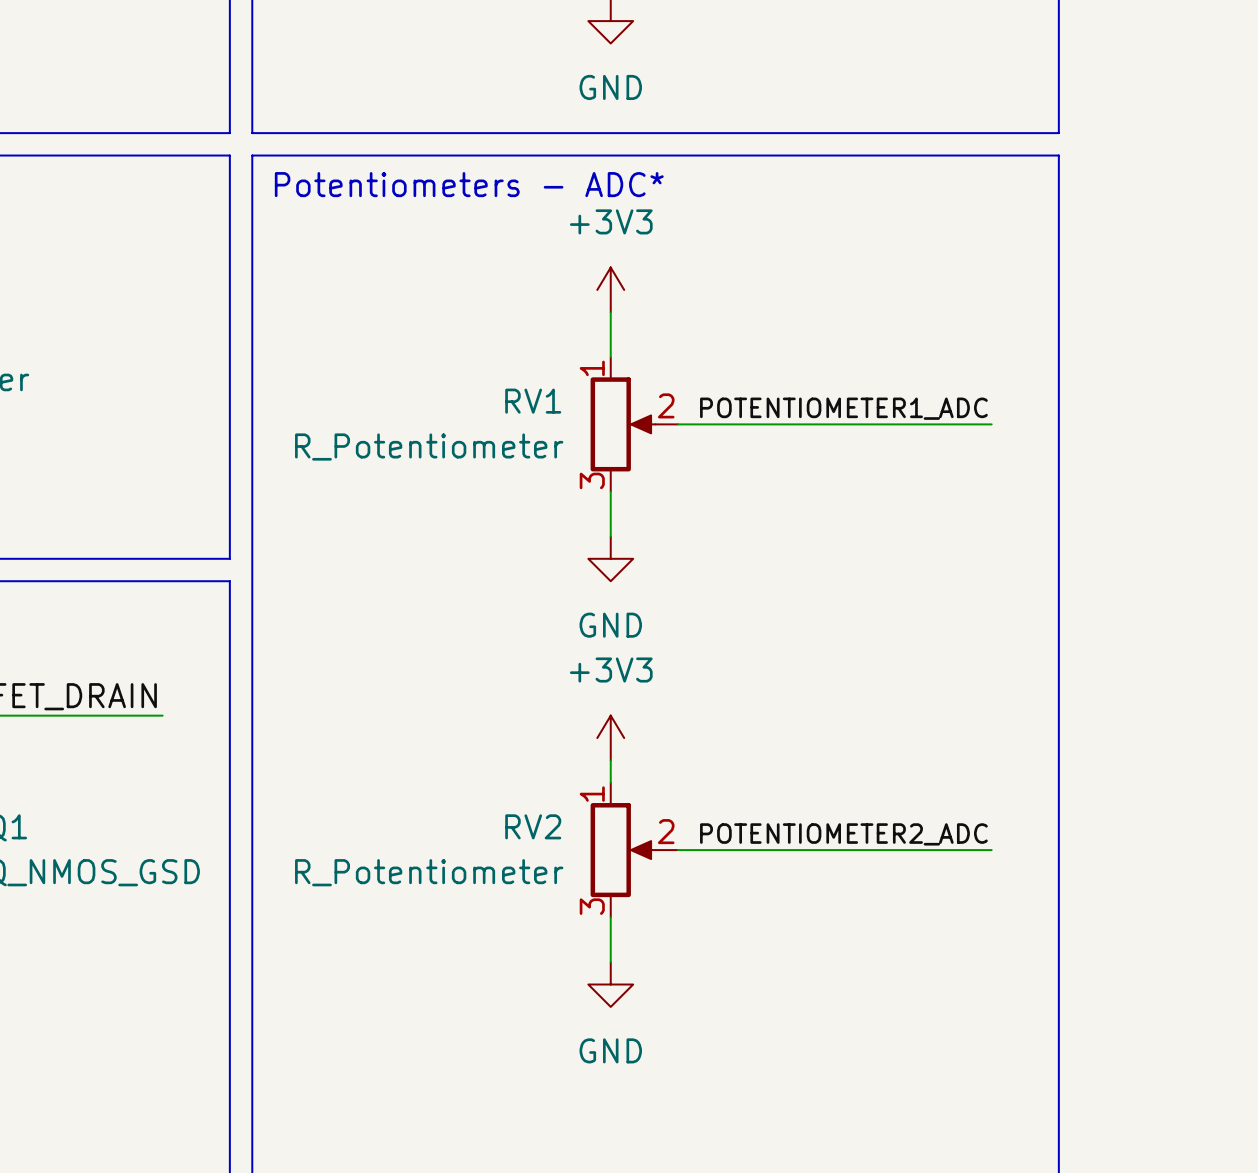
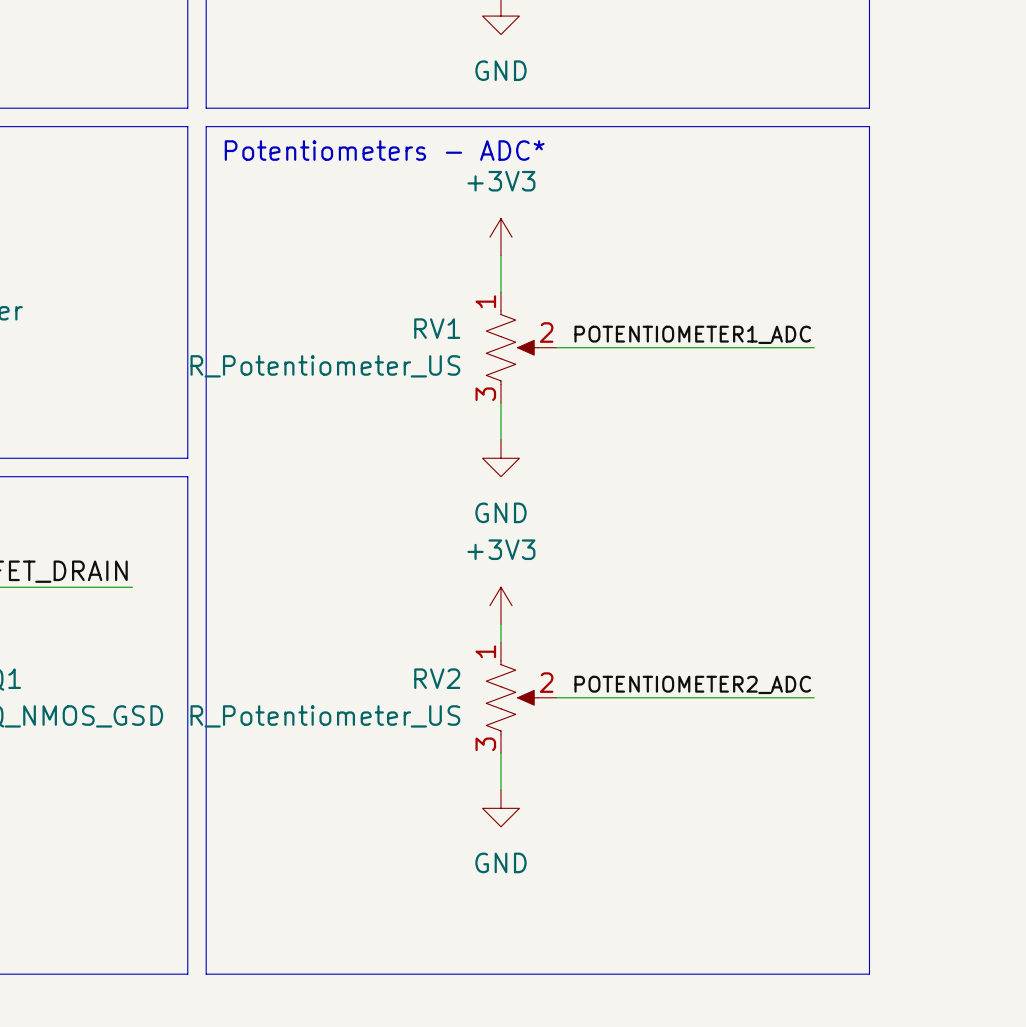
RV1 symbol: [590, 357, 678, 492] -> [486, 292, 557, 404]
RV1 value: R_Potentiometer (429, 447) -> R_Potentiometer_US (325, 366)
RV2 symbol: [590, 782, 678, 918] -> [486, 642, 557, 754]
RV2 value: R_Potentiometer (429, 872) -> R_Potentiometer_US (325, 716)

